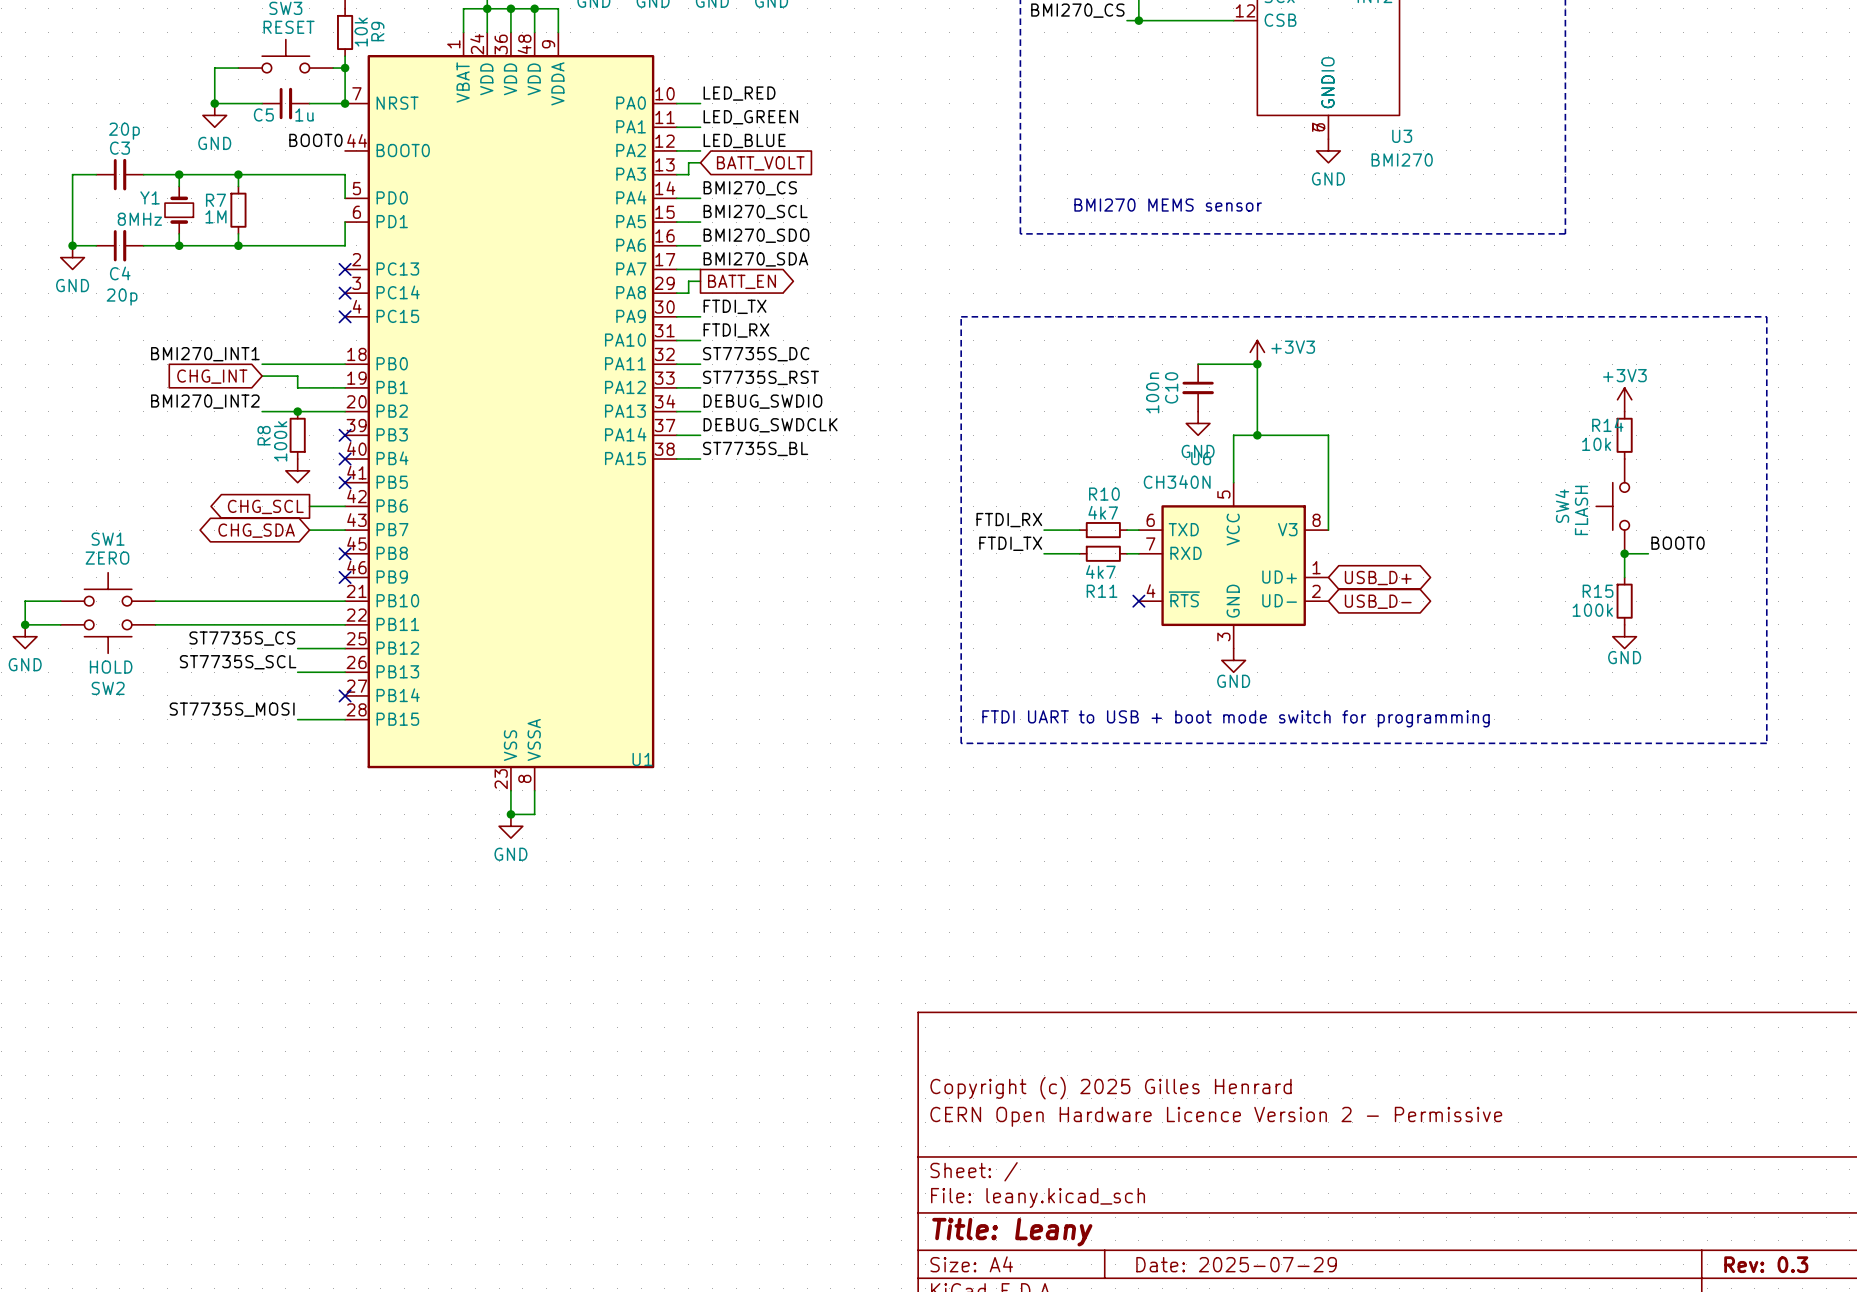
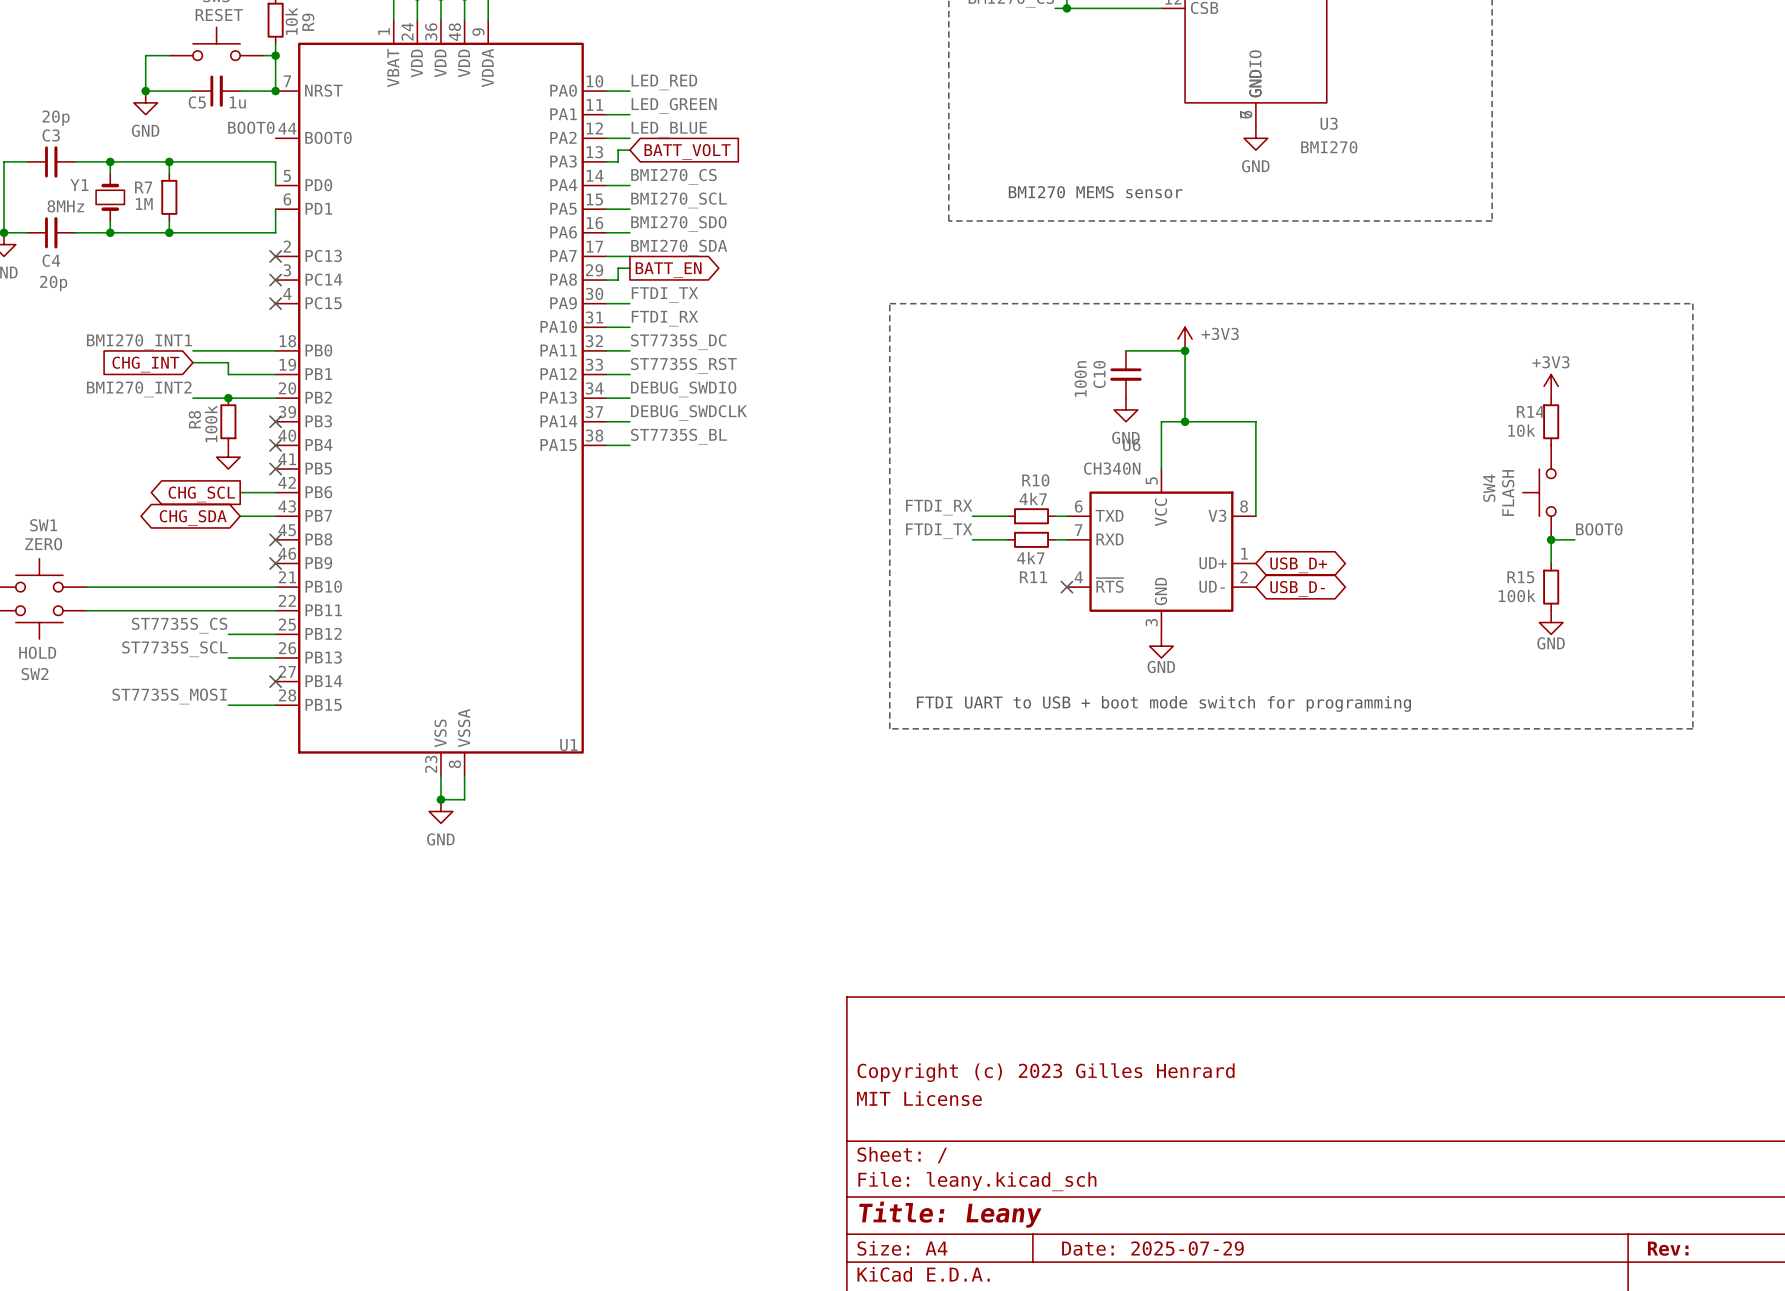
title block: Copyright (c) 2025 Gilles Henrard (1111, 1088) -> Copyright (c) 2023 Gilles Henrard (1046, 1072)
title block: CERN Open Hardware Licence Version 2 - Permissive (1216, 1116) -> MIT License (919, 1098)
title block: Rev: 0.3 (1766, 1264) -> Rev: (1668, 1248)

